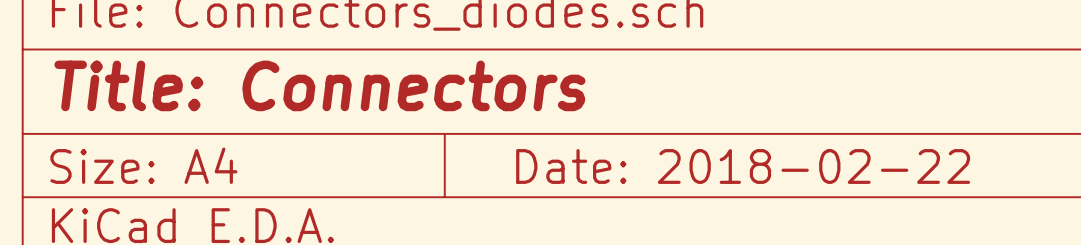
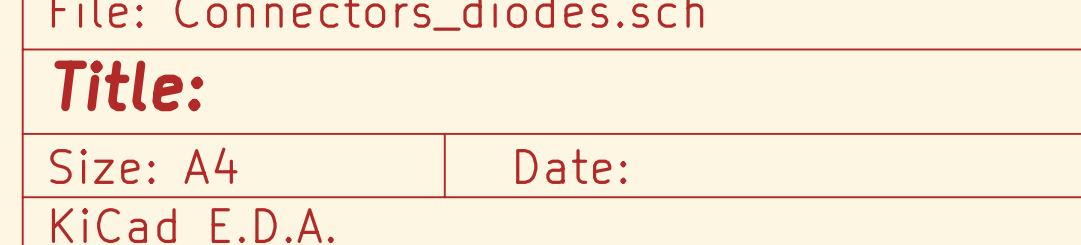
title block: Title: Connectors (319, 85) -> Title: (128, 85)
title block: Date: 2018-02-22 (743, 166) -> Date: (571, 166)

